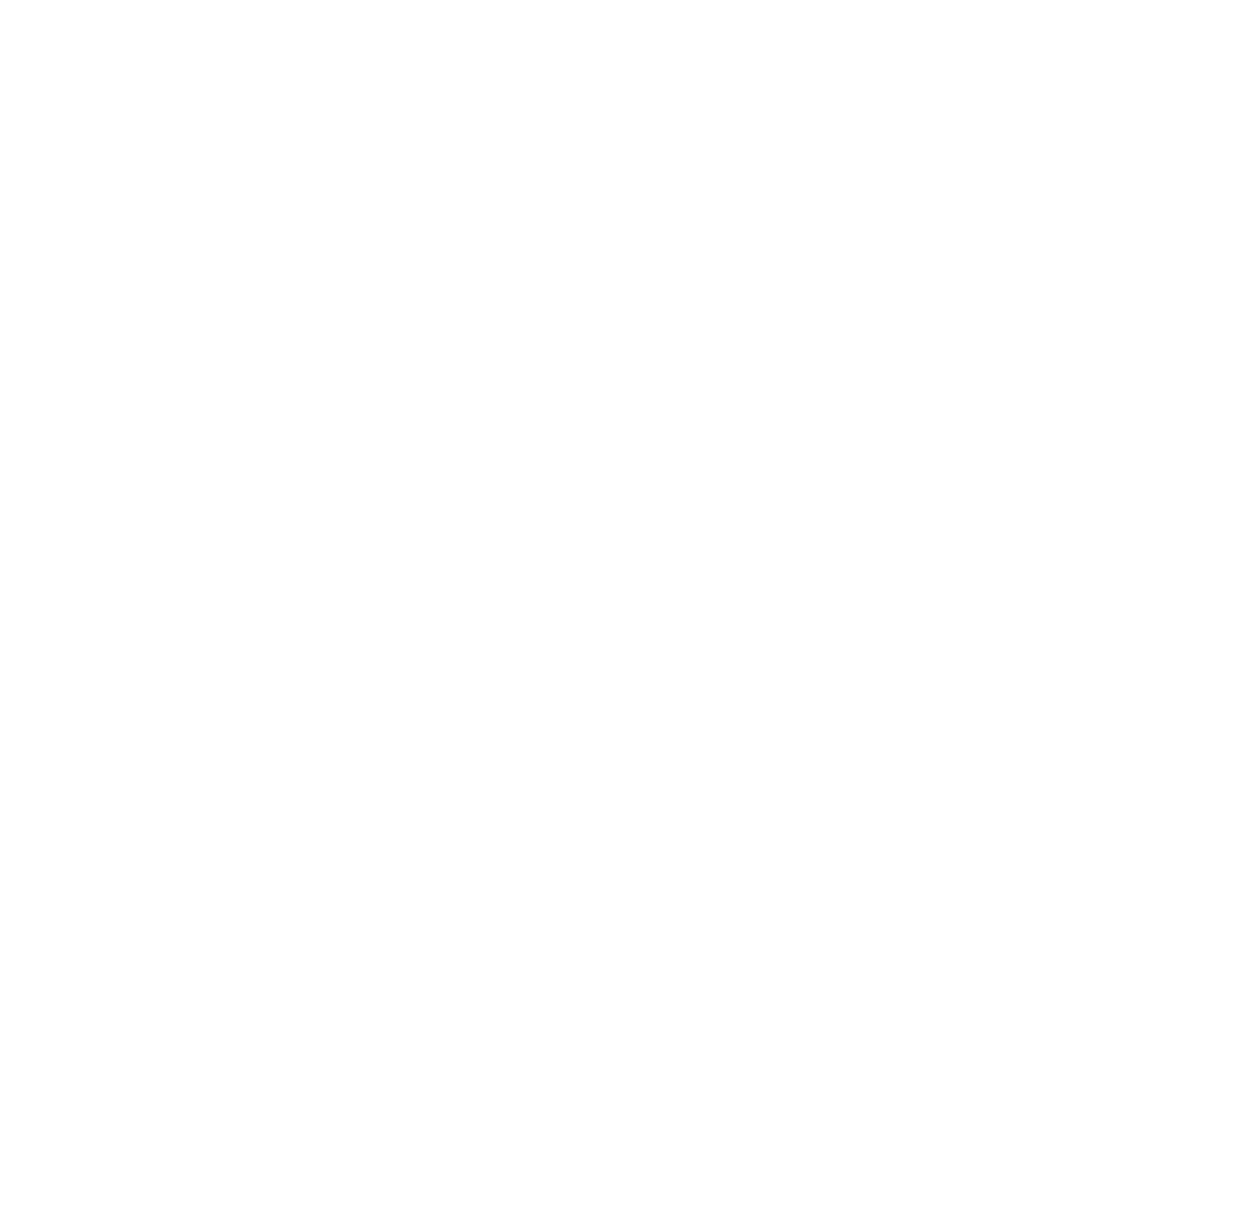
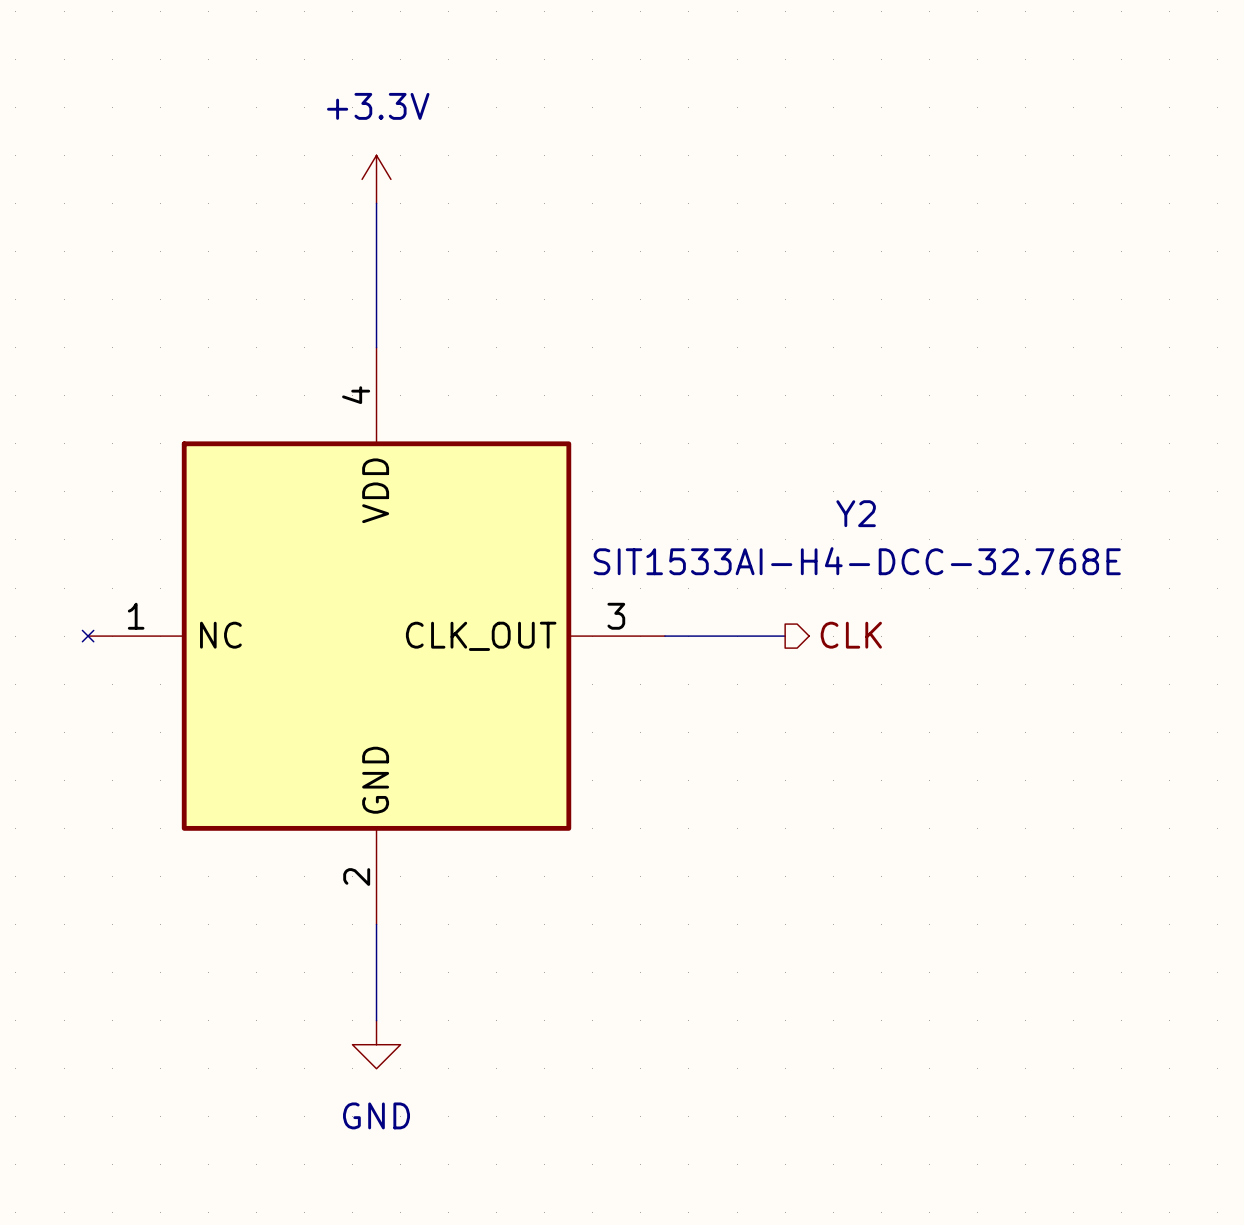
power symbol: none -> +3.3V (376, 179)
wire: none -> (376, 203) (376, 347)
hierarchical label: none -> CLK (851, 635)
Y2: none -> SIT1533AI-H4-DCC-32.768E (373, 636)
wire: none -> (664, 636) (785, 636)
wire: none -> (376, 924) (376, 1020)
power symbol: none -> GND (376, 1044)

